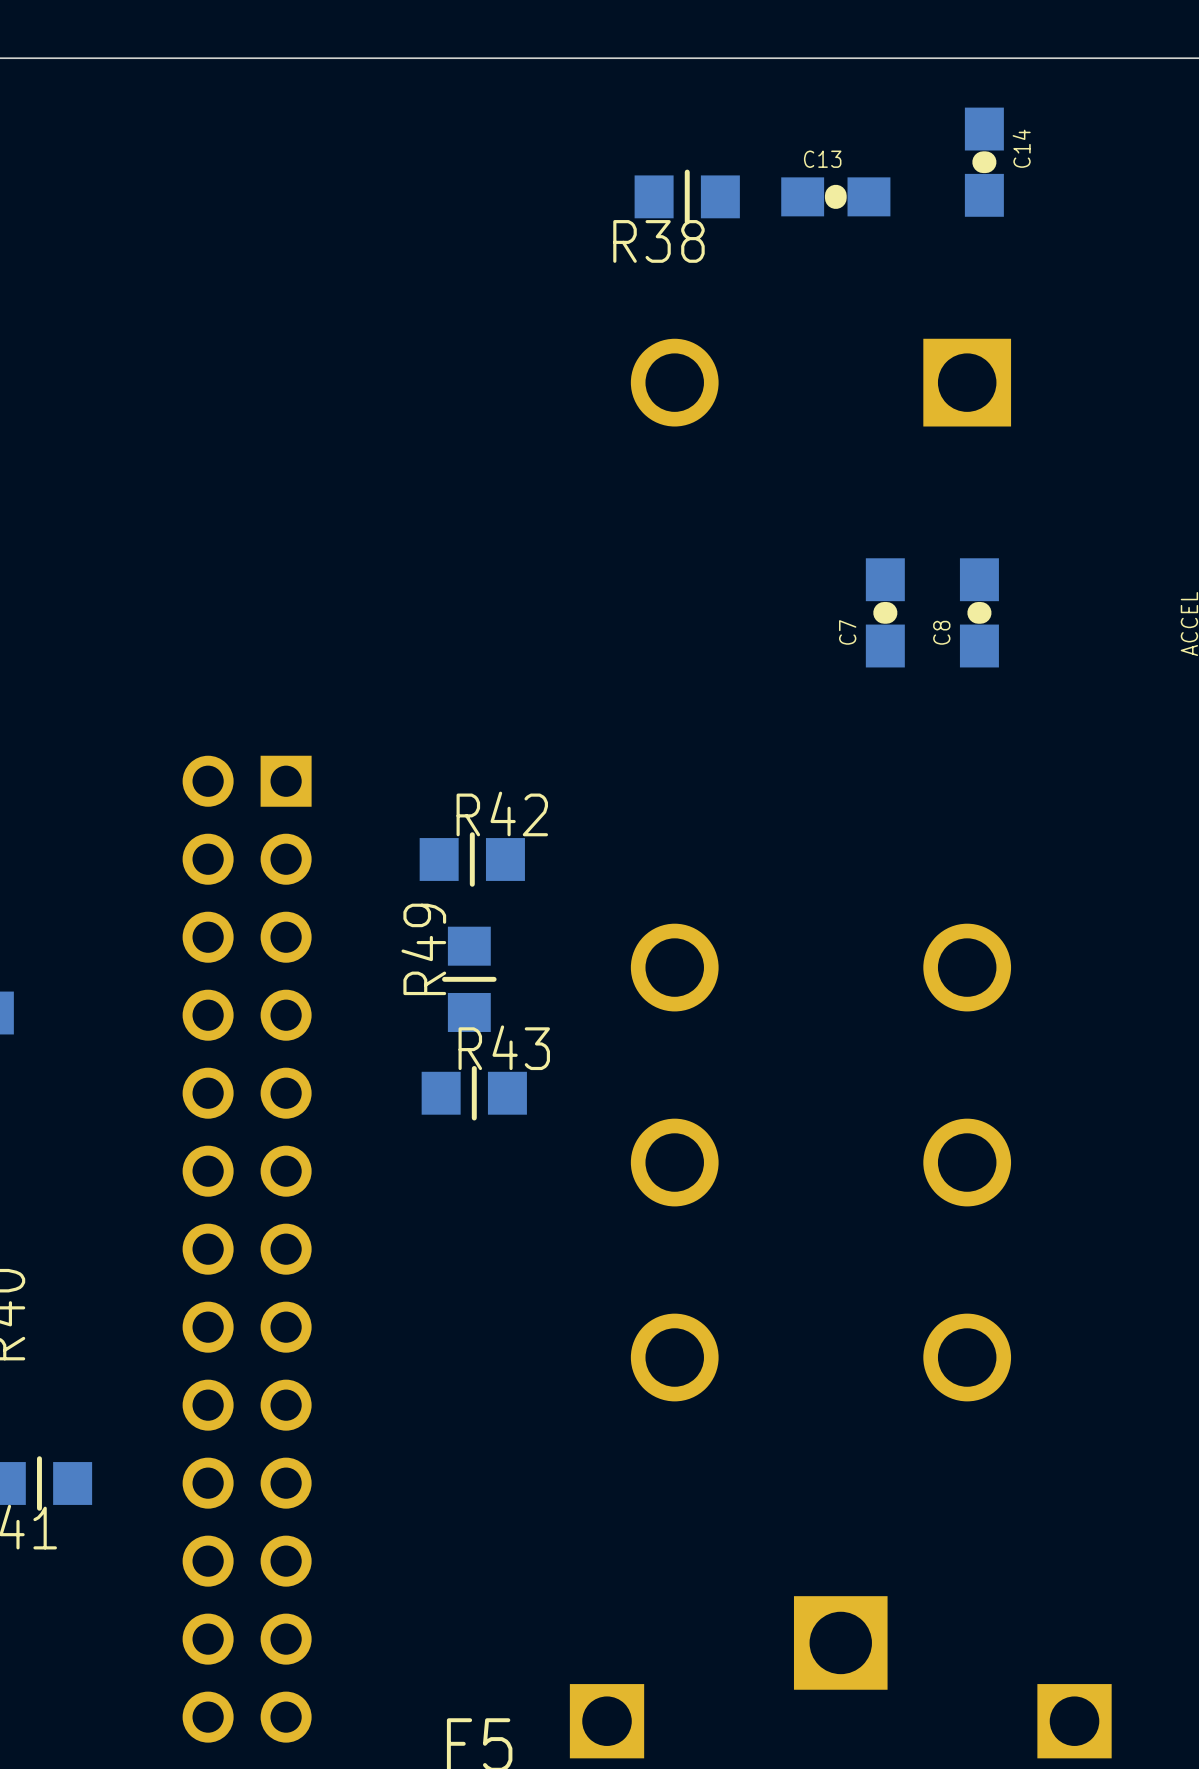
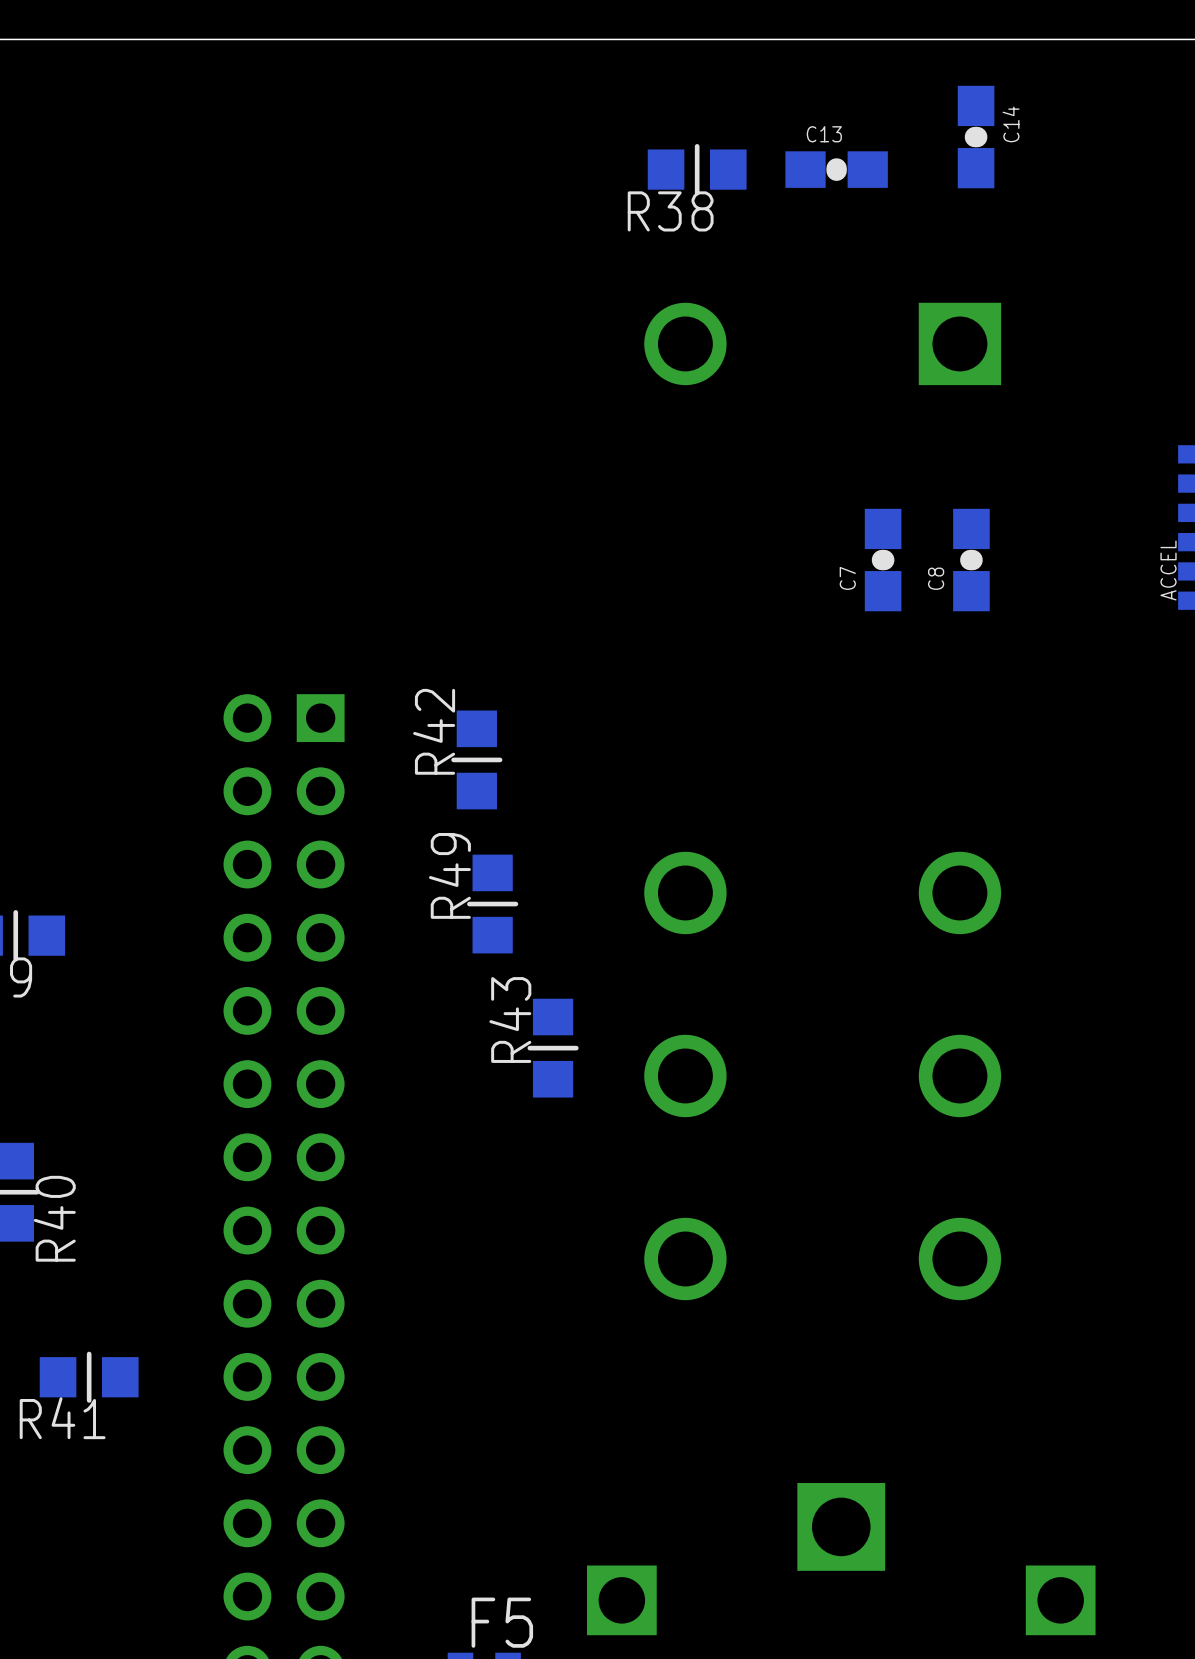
R42 name position: R42 (502, 813) -> R42 (434, 731)
R42 rotation: 0° (472, 859) -> 90° clockwise (476, 759)
R43 name position: R43 (504, 1047) -> R43 (510, 1020)
R43 rotation: 0° (474, 1093) -> 90° clockwise (553, 1048)
R43 position: (474, 1093) -> (553, 1048)

